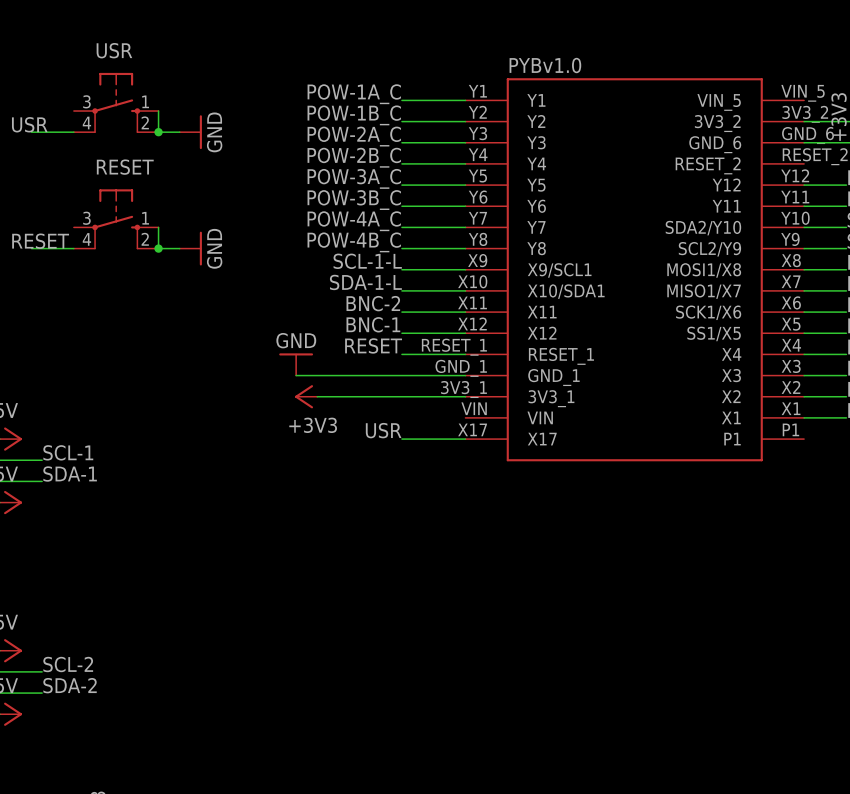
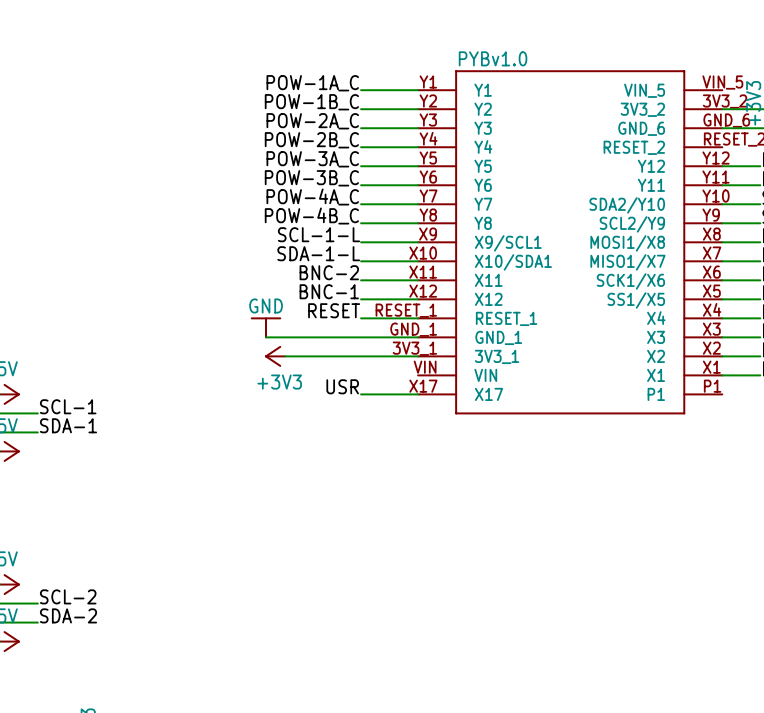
USR: (116, 102) -> none
wire: (158, 111) (158, 132) (179, 132) -> none
label: USR (29, 124) -> none
wire: (31, 132) (73, 132) -> none
junction: (158, 132) -> none
power symbol: GND (190, 132) -> none
RESET: (116, 219) -> none
wire: (158, 227) (158, 248) (179, 248) -> none
label: RESET (40, 241) -> none
wire: (31, 248) (73, 248) -> none
junction: (158, 248) -> none
power symbol: GND (190, 248) -> none

